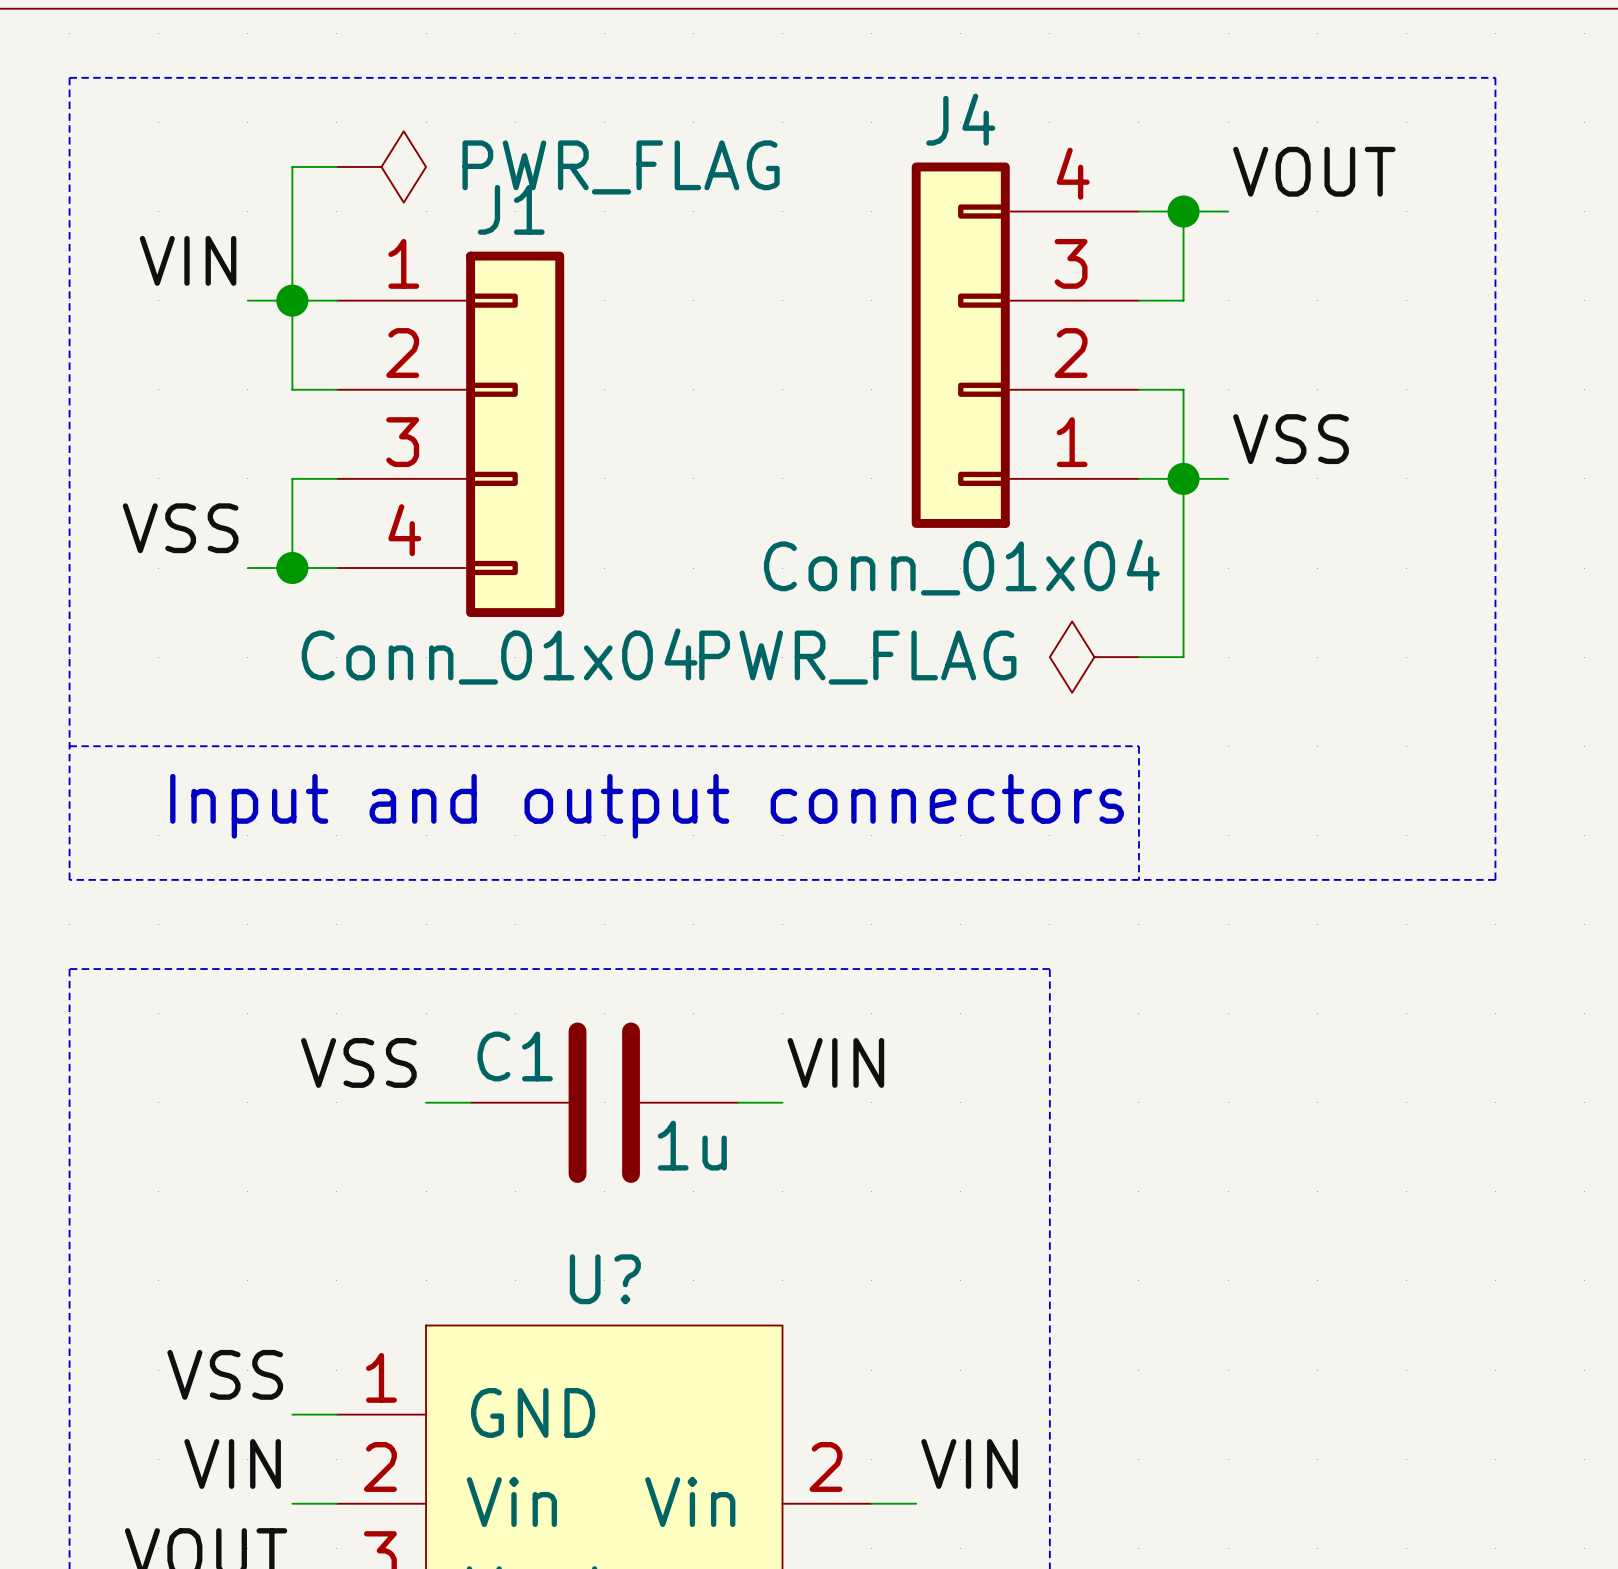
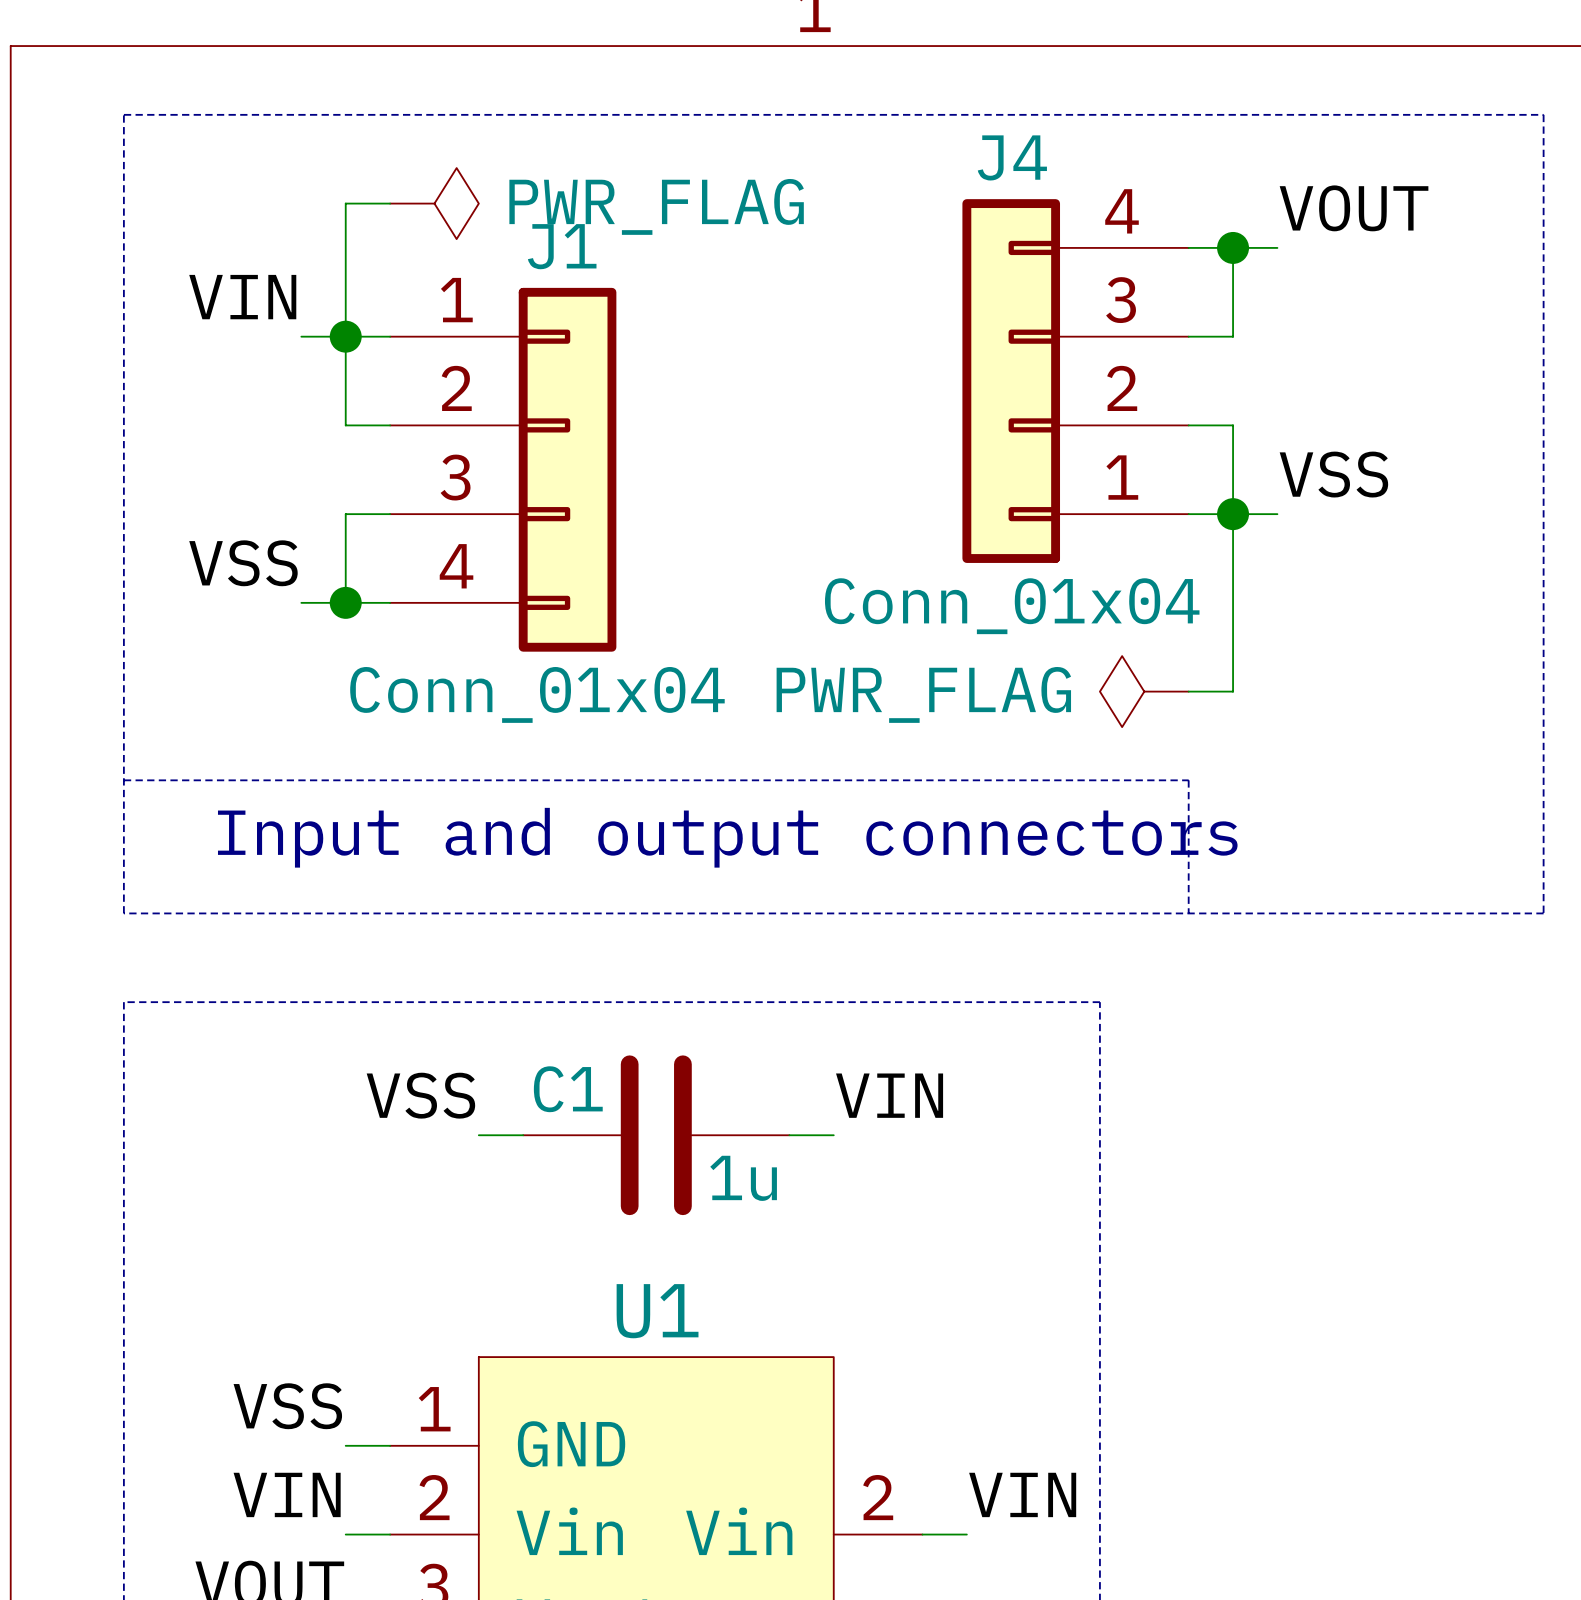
U? name: U? (605, 1279) -> U1 (657, 1311)

